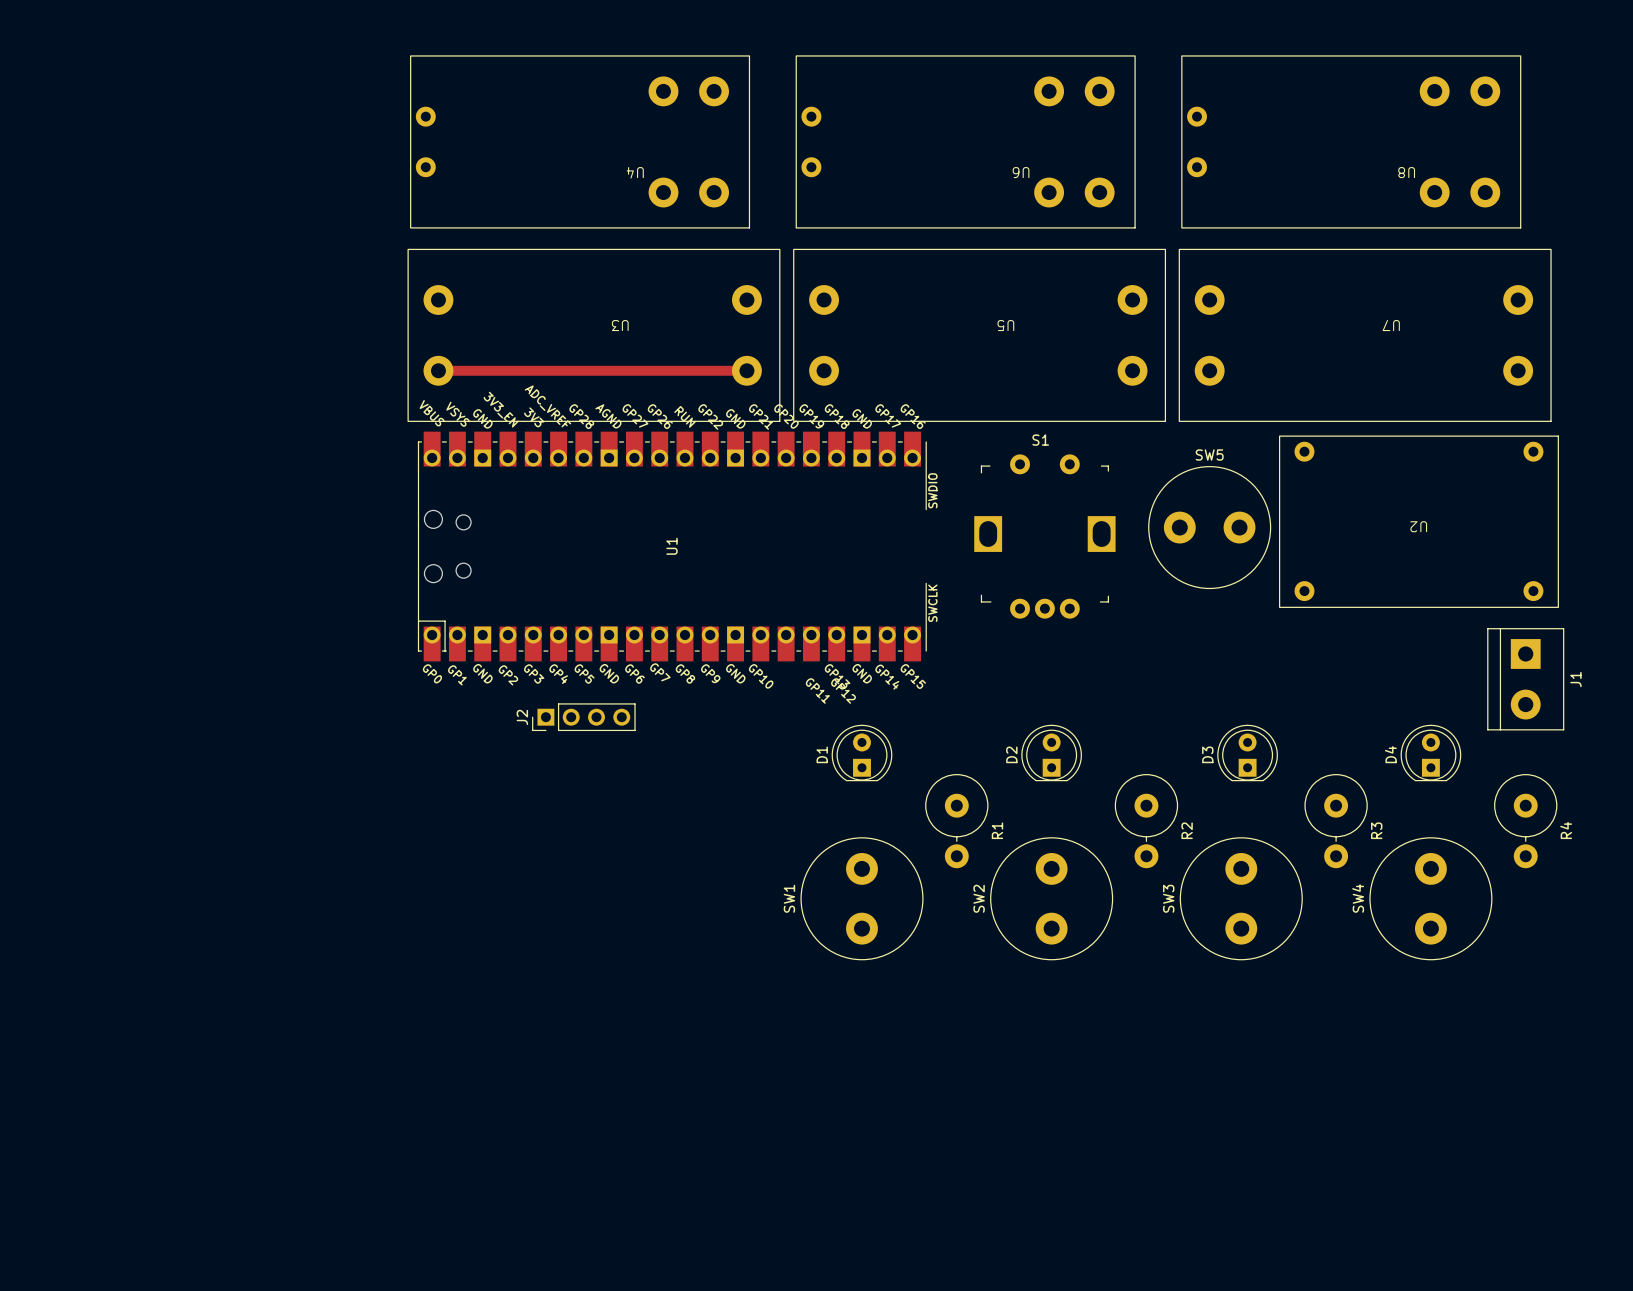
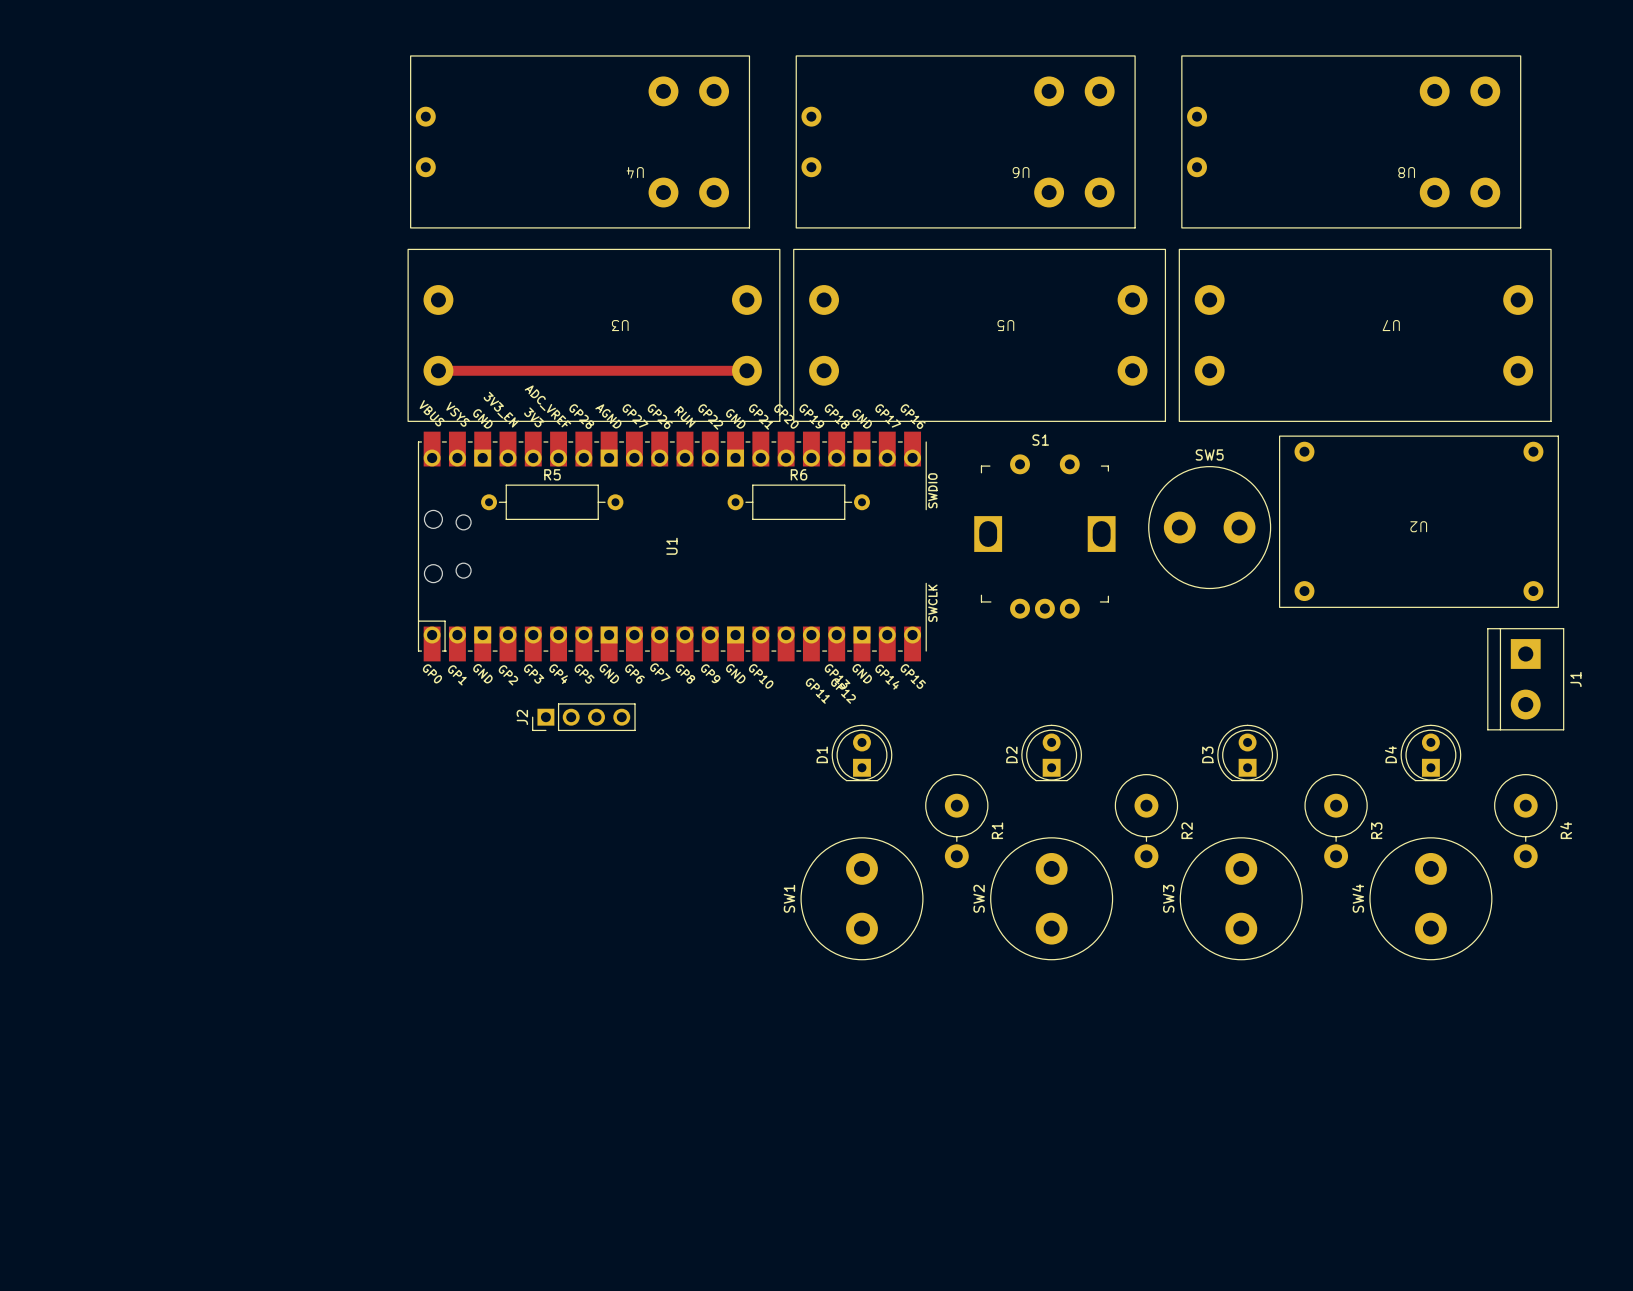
R5: none -> (552, 502)
R6: none -> (798, 502)

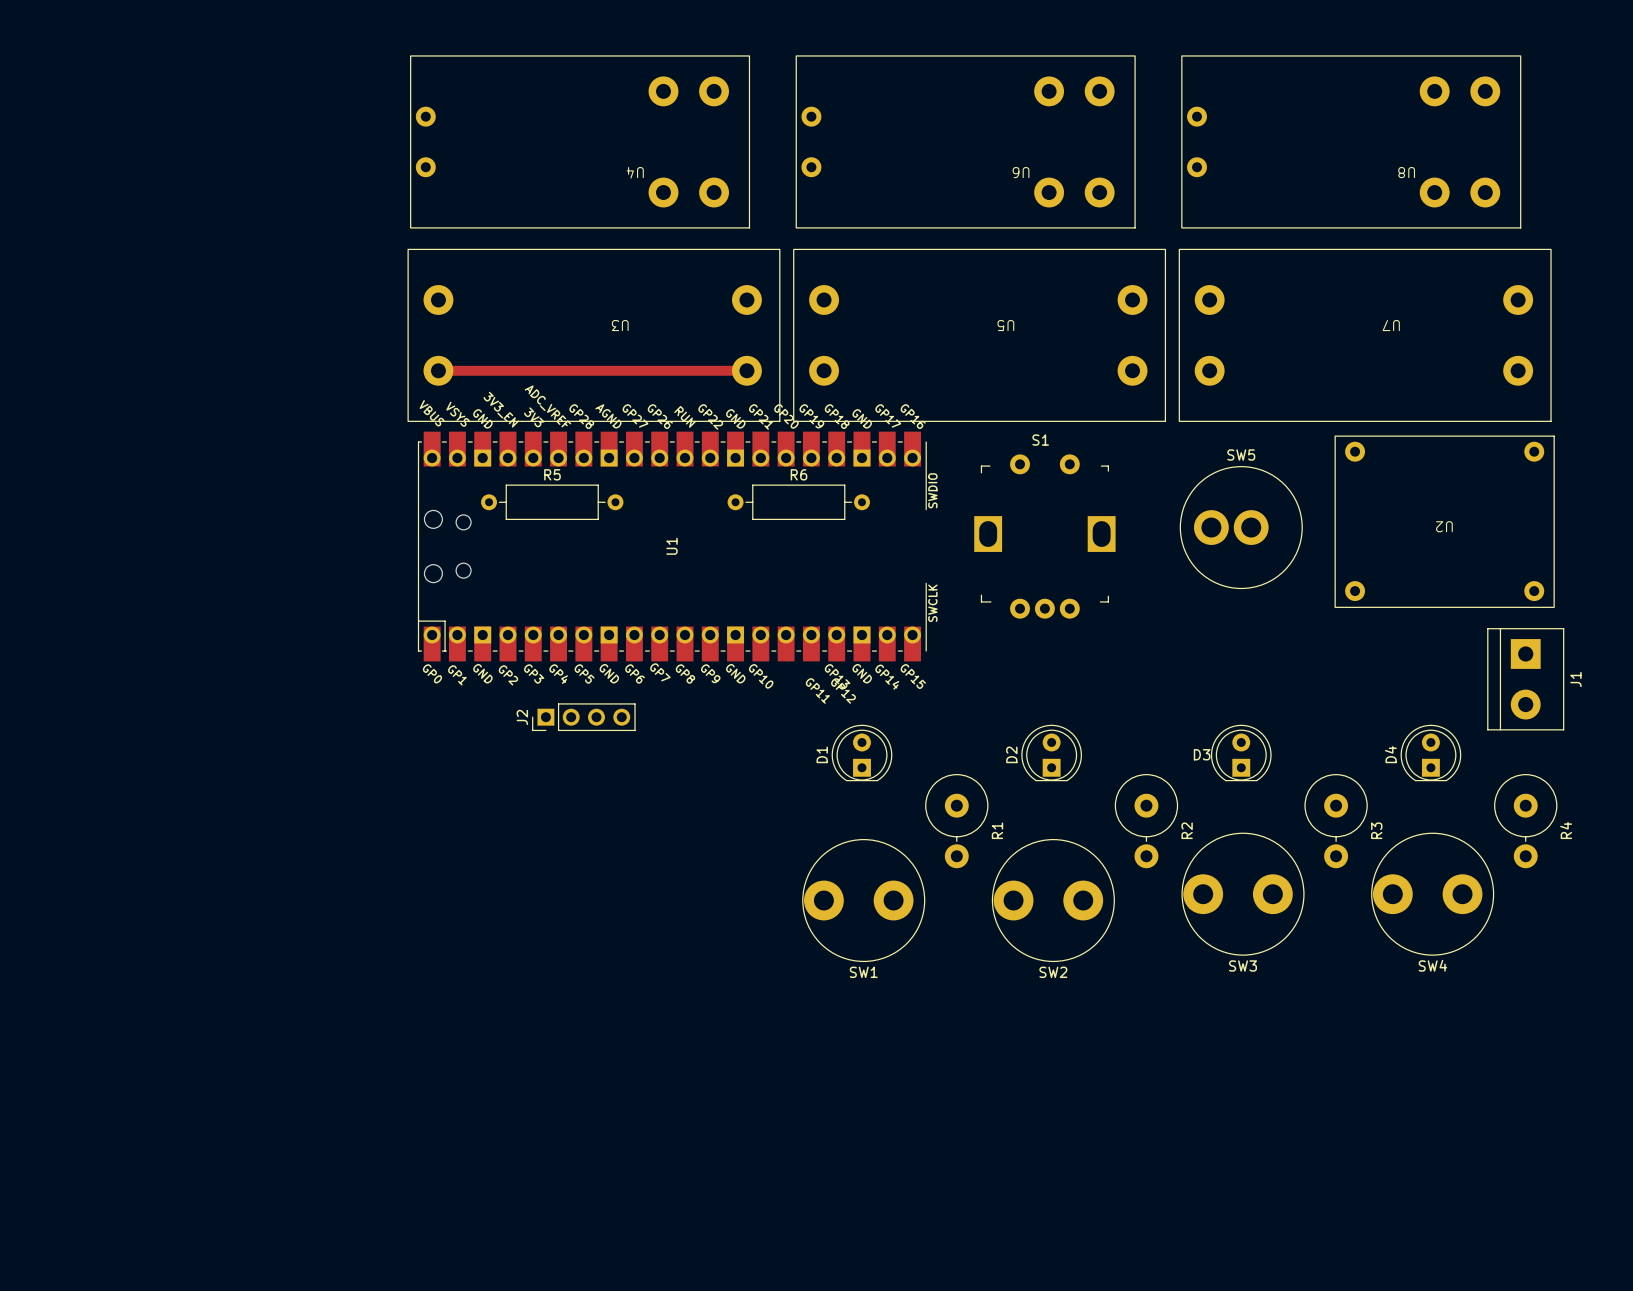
U2 footprint: [1279, 435, 1559, 608] -> [1334, 435, 1555, 608]
SW5 footprint: [1148, 466, 1272, 590] -> [1179, 466, 1303, 590]
D3 footprint: [1217, 724, 1278, 782] -> [1210, 724, 1272, 782]
D3 name rotation: 0° (1207, 754) -> 90° clockwise (1202, 754)
SW1 footprint: [800, 837, 924, 961] -> [802, 838, 926, 963]
SW2 footprint: [990, 837, 1114, 961] -> [991, 838, 1115, 963]
SW3 footprint: [1179, 837, 1303, 961] -> [1181, 832, 1305, 956]
SW4 footprint: [1369, 837, 1493, 961] -> [1371, 832, 1495, 956]
SW1 name position: SW1 (789, 898) -> SW1 (863, 972)
SW2 name position: SW2 (979, 898) -> SW2 (1053, 972)
SW3 name position: SW3 (1168, 898) -> SW3 (1243, 965)
SW4 name position: SW4 (1358, 898) -> SW4 (1432, 965)

